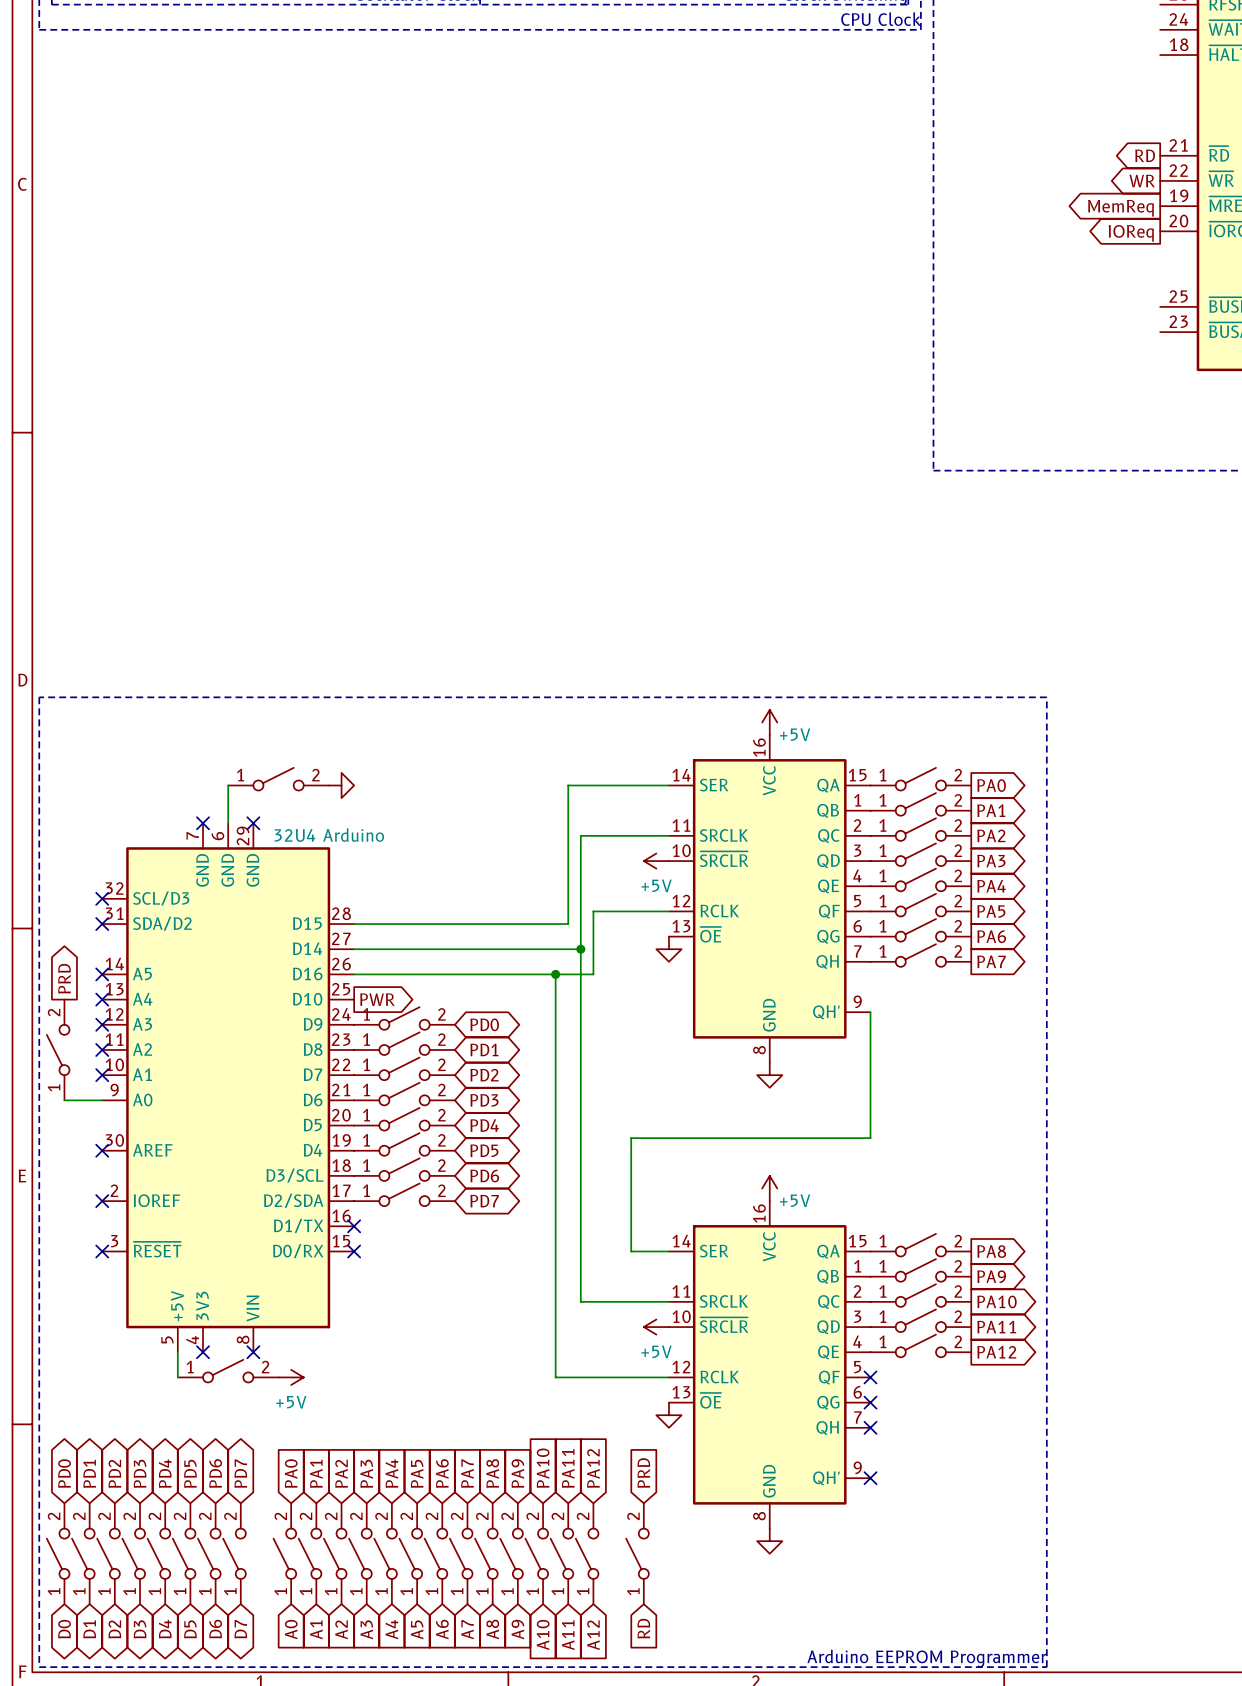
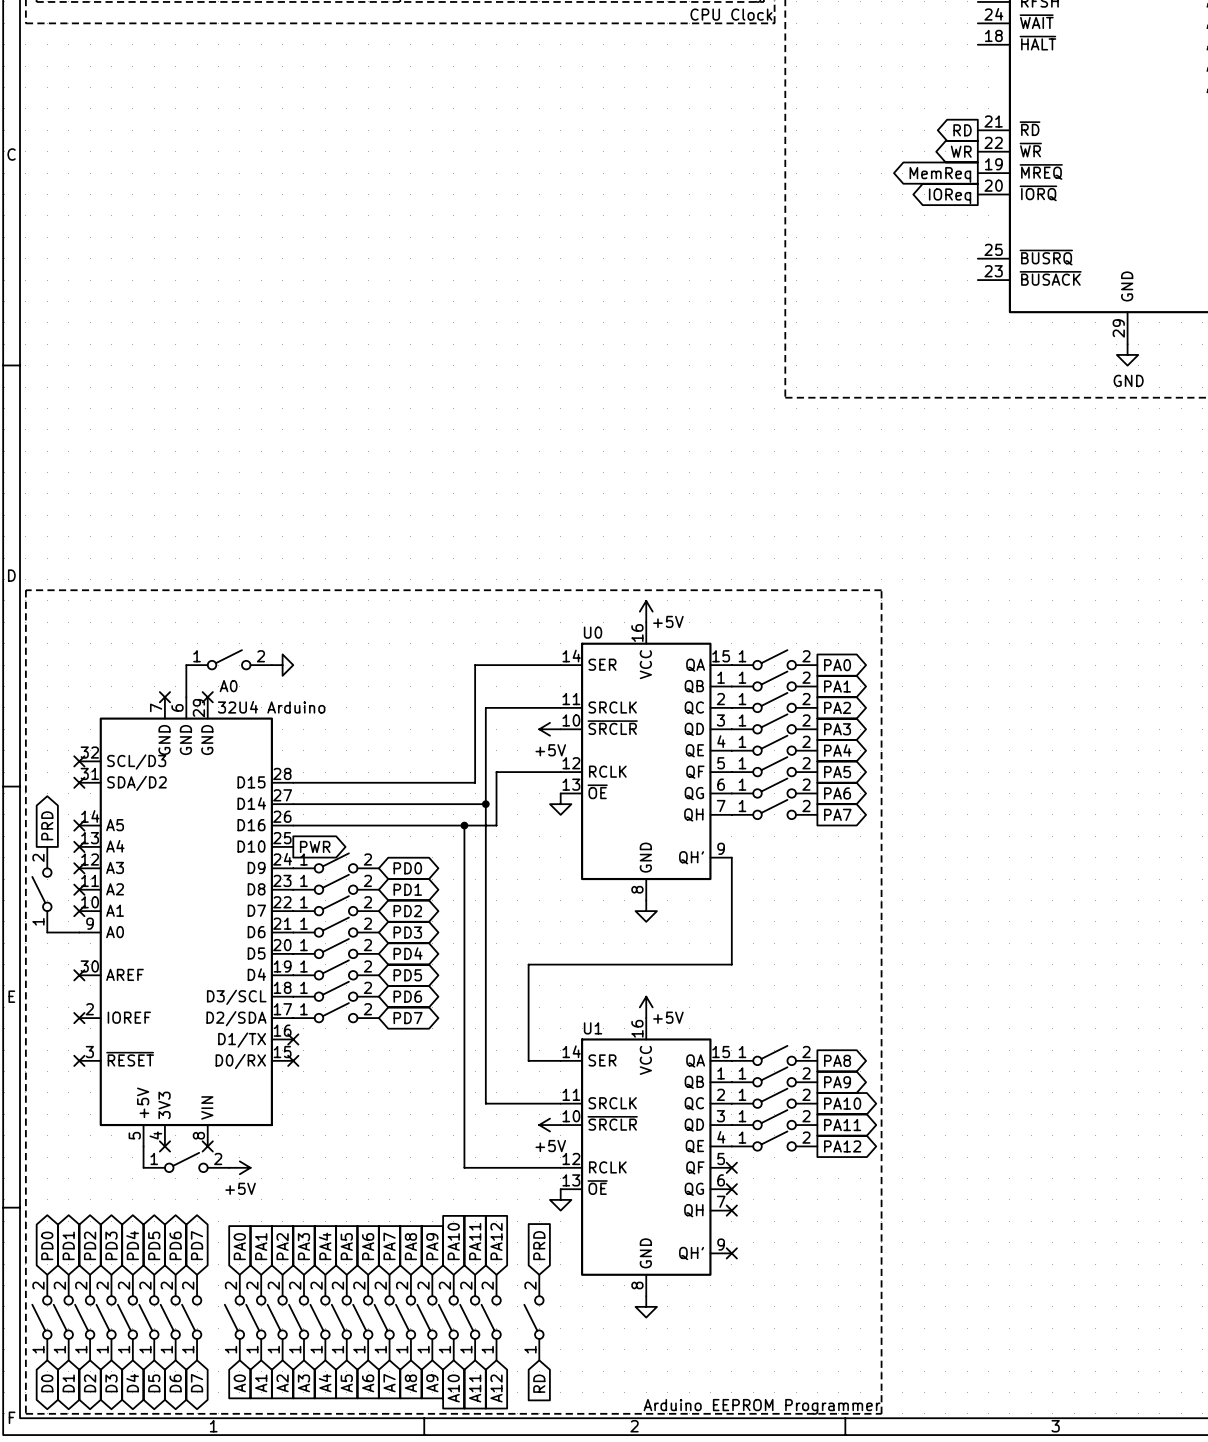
U0 name: none -> U0 (593, 632)
A0 name: none -> A0 (228, 686)
U1 name: none -> U1 (593, 1028)

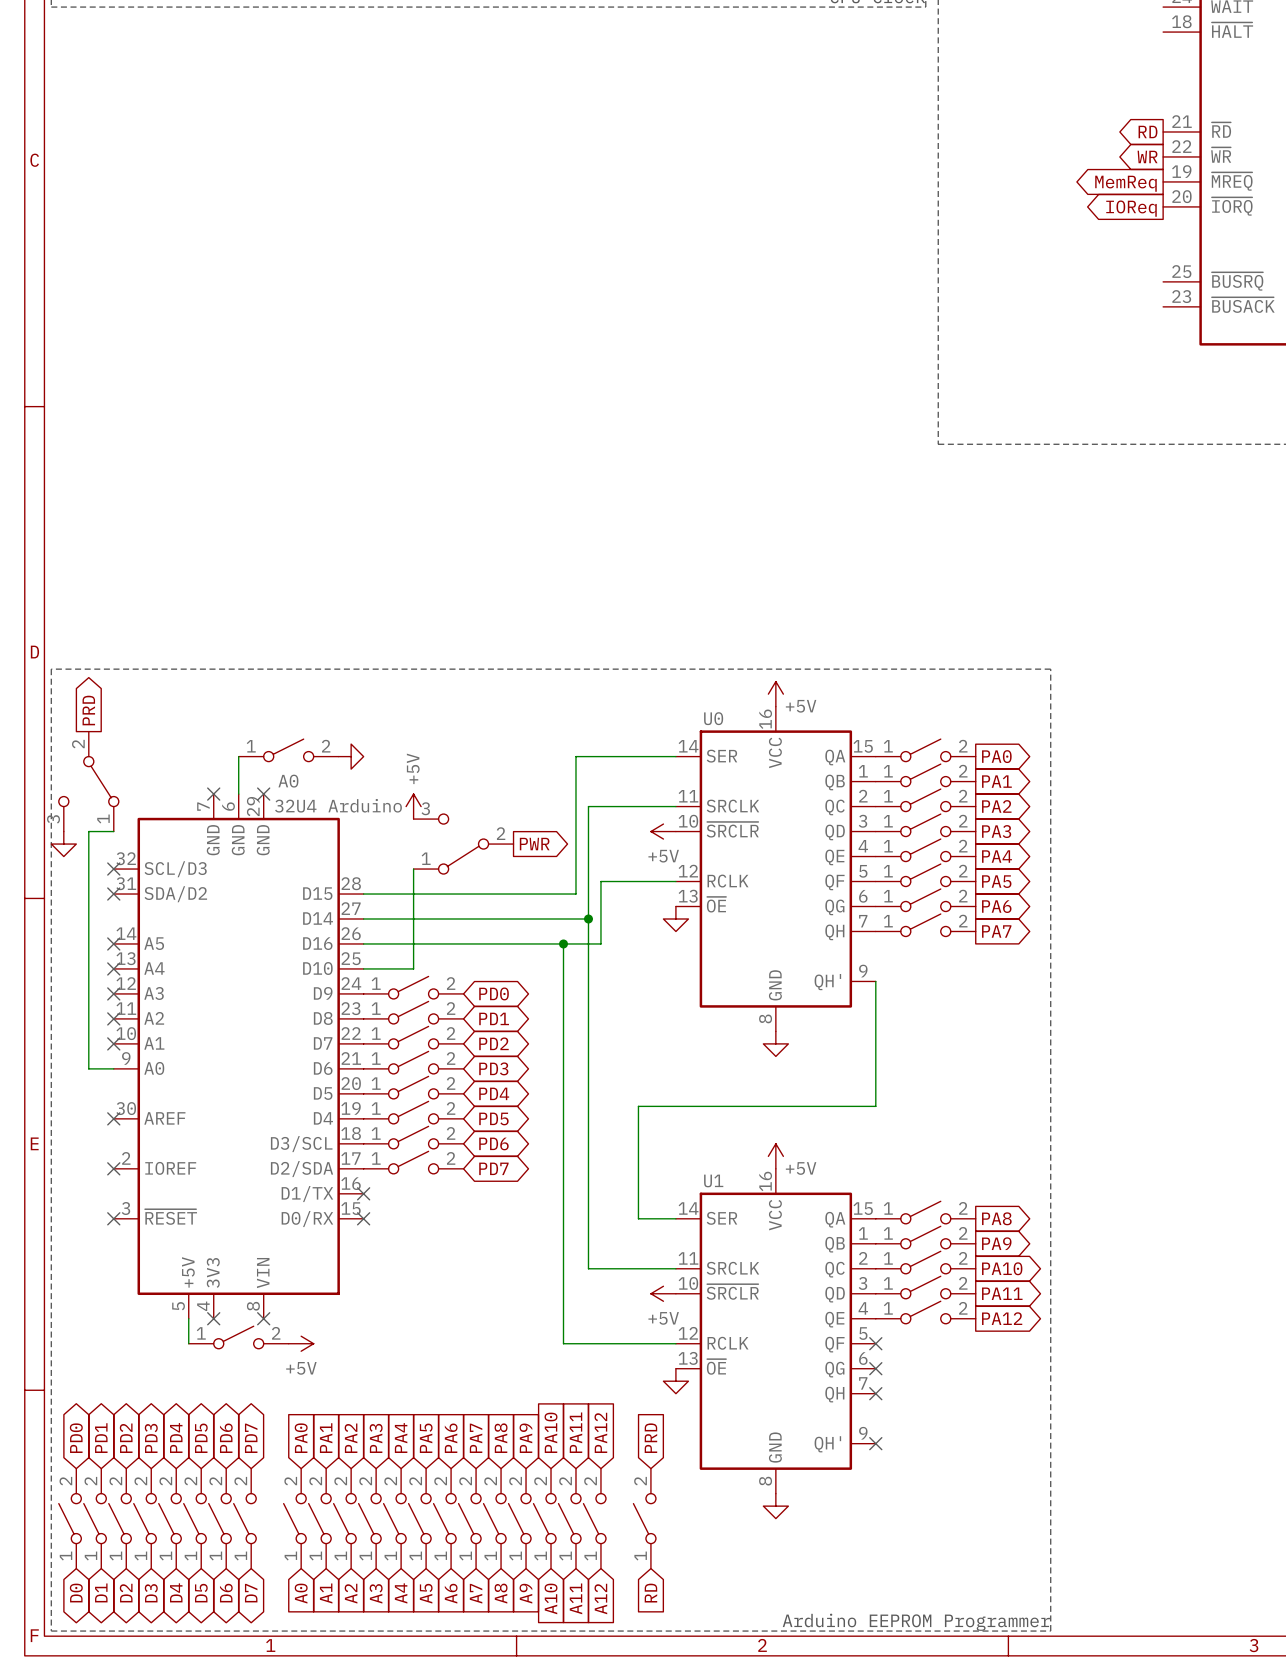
part: none -> (88, 781)
power symbol: none -> +5V (413, 806)
power symbol: none -> (63, 844)
part: none -> (463, 844)
wire: none -> (413, 869) (413, 968) (363, 968)
global label position: PRD (47, 825) -> PRD (88, 710)
global label position: PWR (315, 846) -> PWR (534, 844)
part: (41, 889) -> none
wire: (47, 932) (57, 932) -> (113, 831) (88, 831) (88, 1068)

